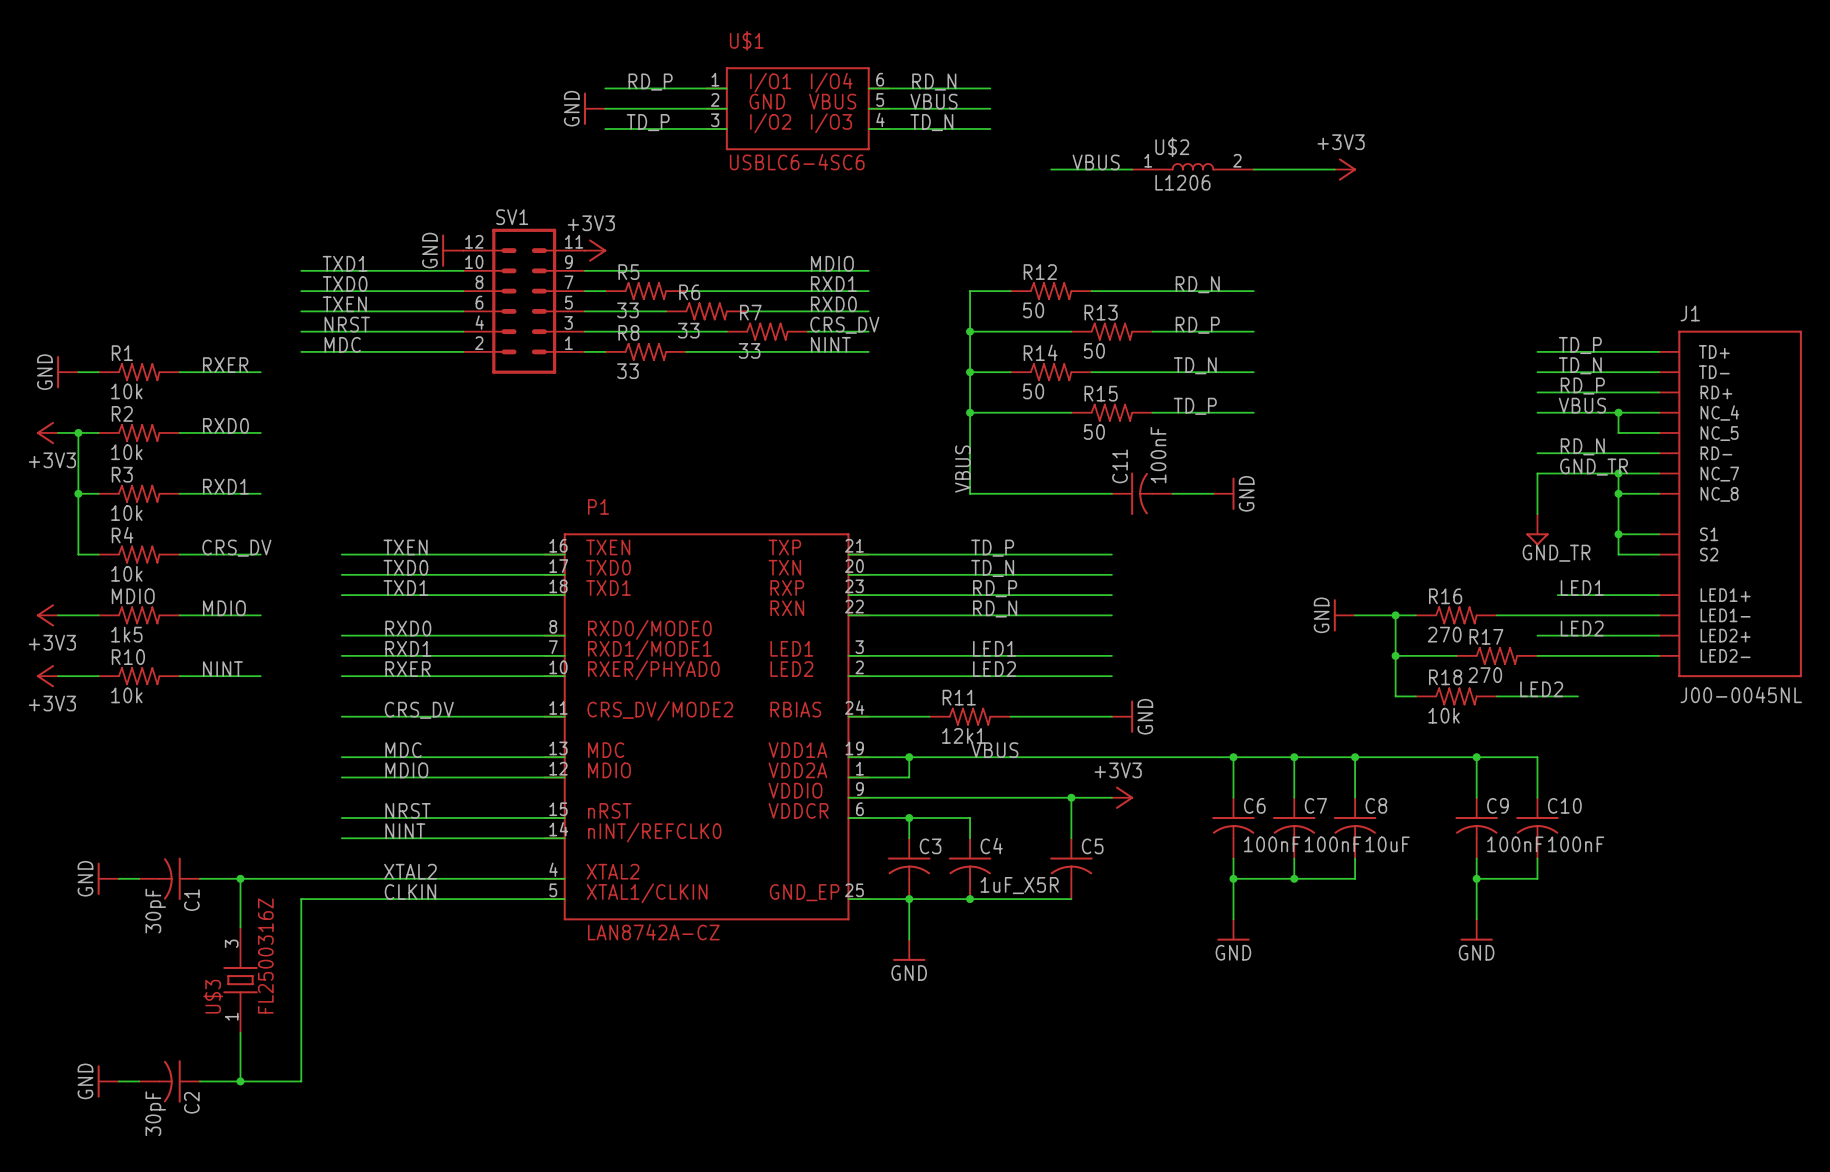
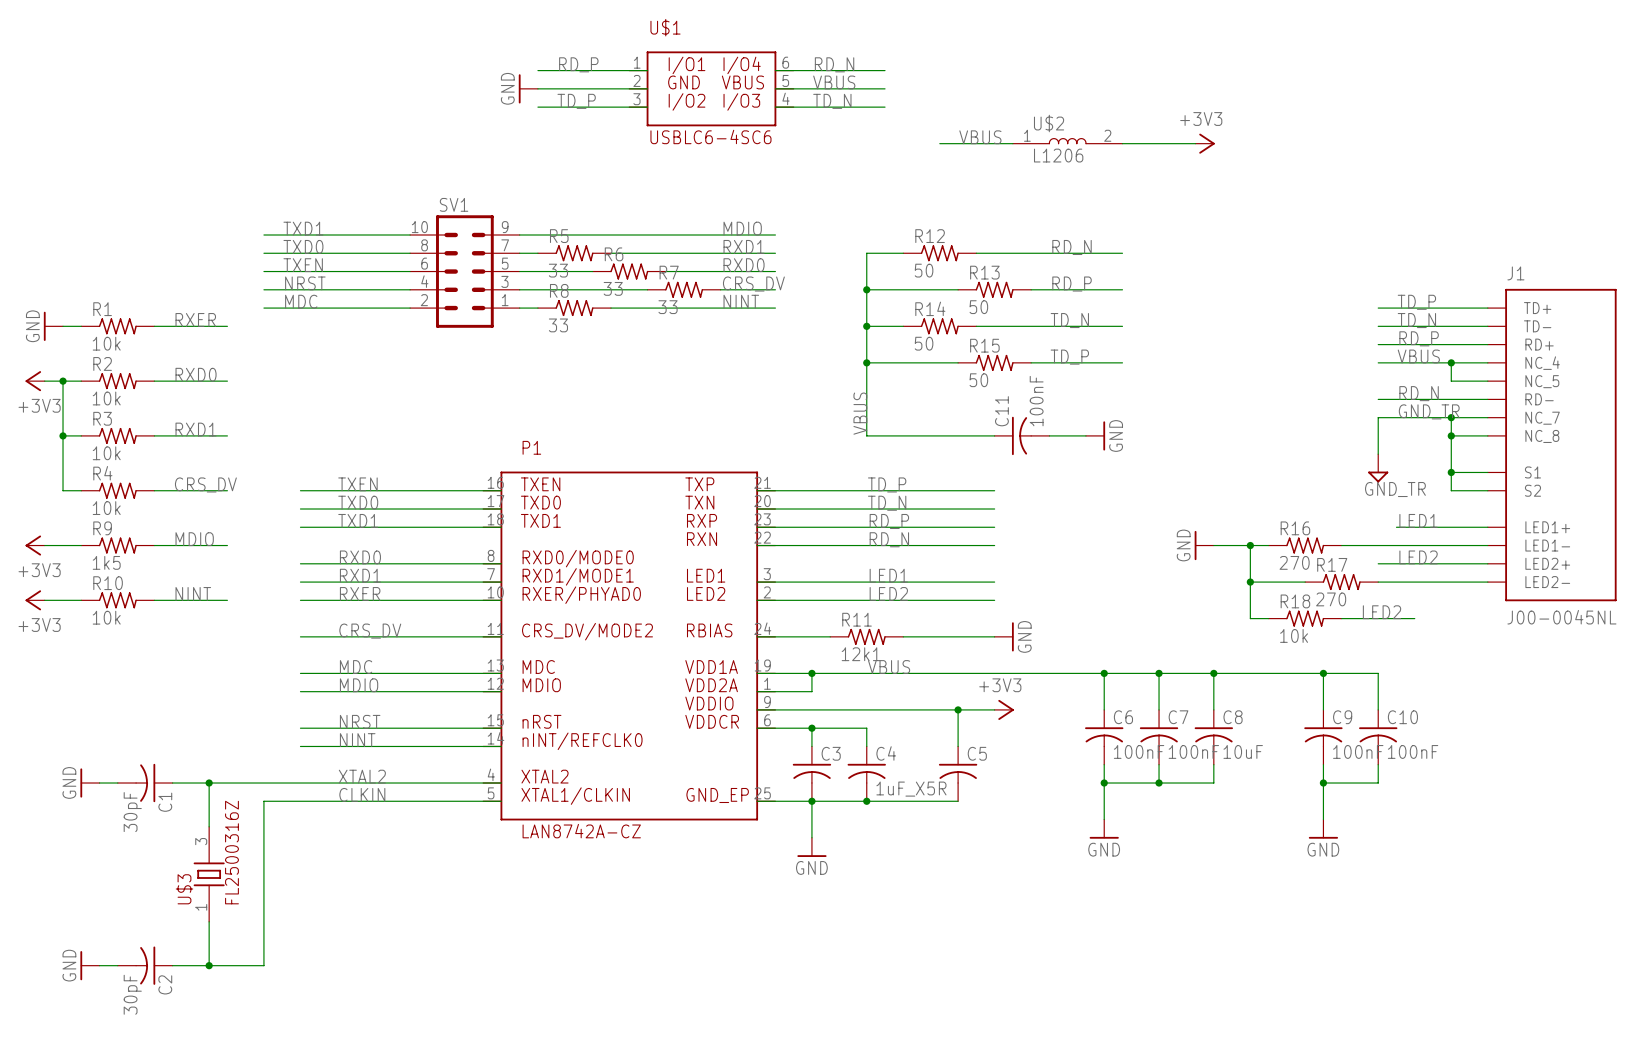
SV1 symbol: [463, 228, 586, 374] -> [410, 215, 520, 328]
power symbol: GND (452, 250) -> none
power symbol: +3V3 (595, 250) -> none
MDIO name: MDIO (133, 596) -> R9 (102, 528)

